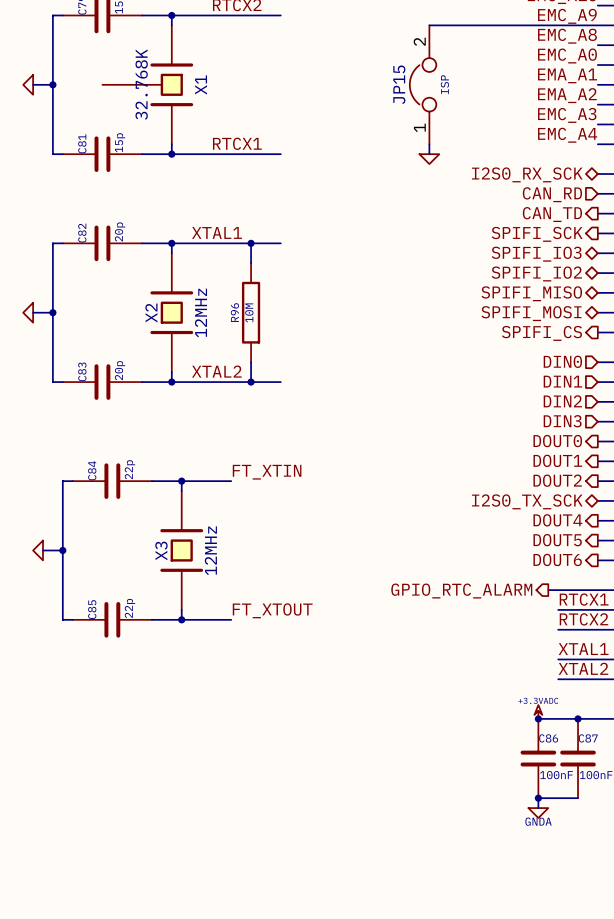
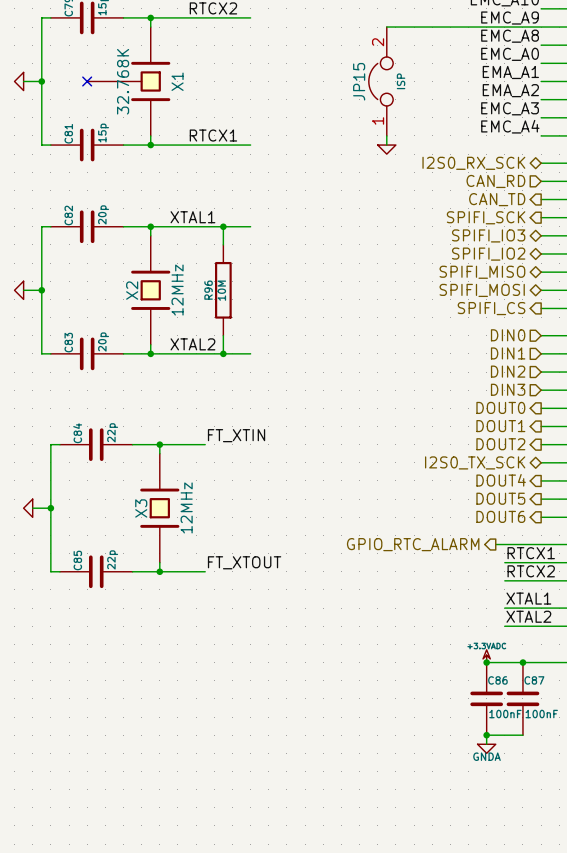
no-connect mark: none -> (87, 81)

